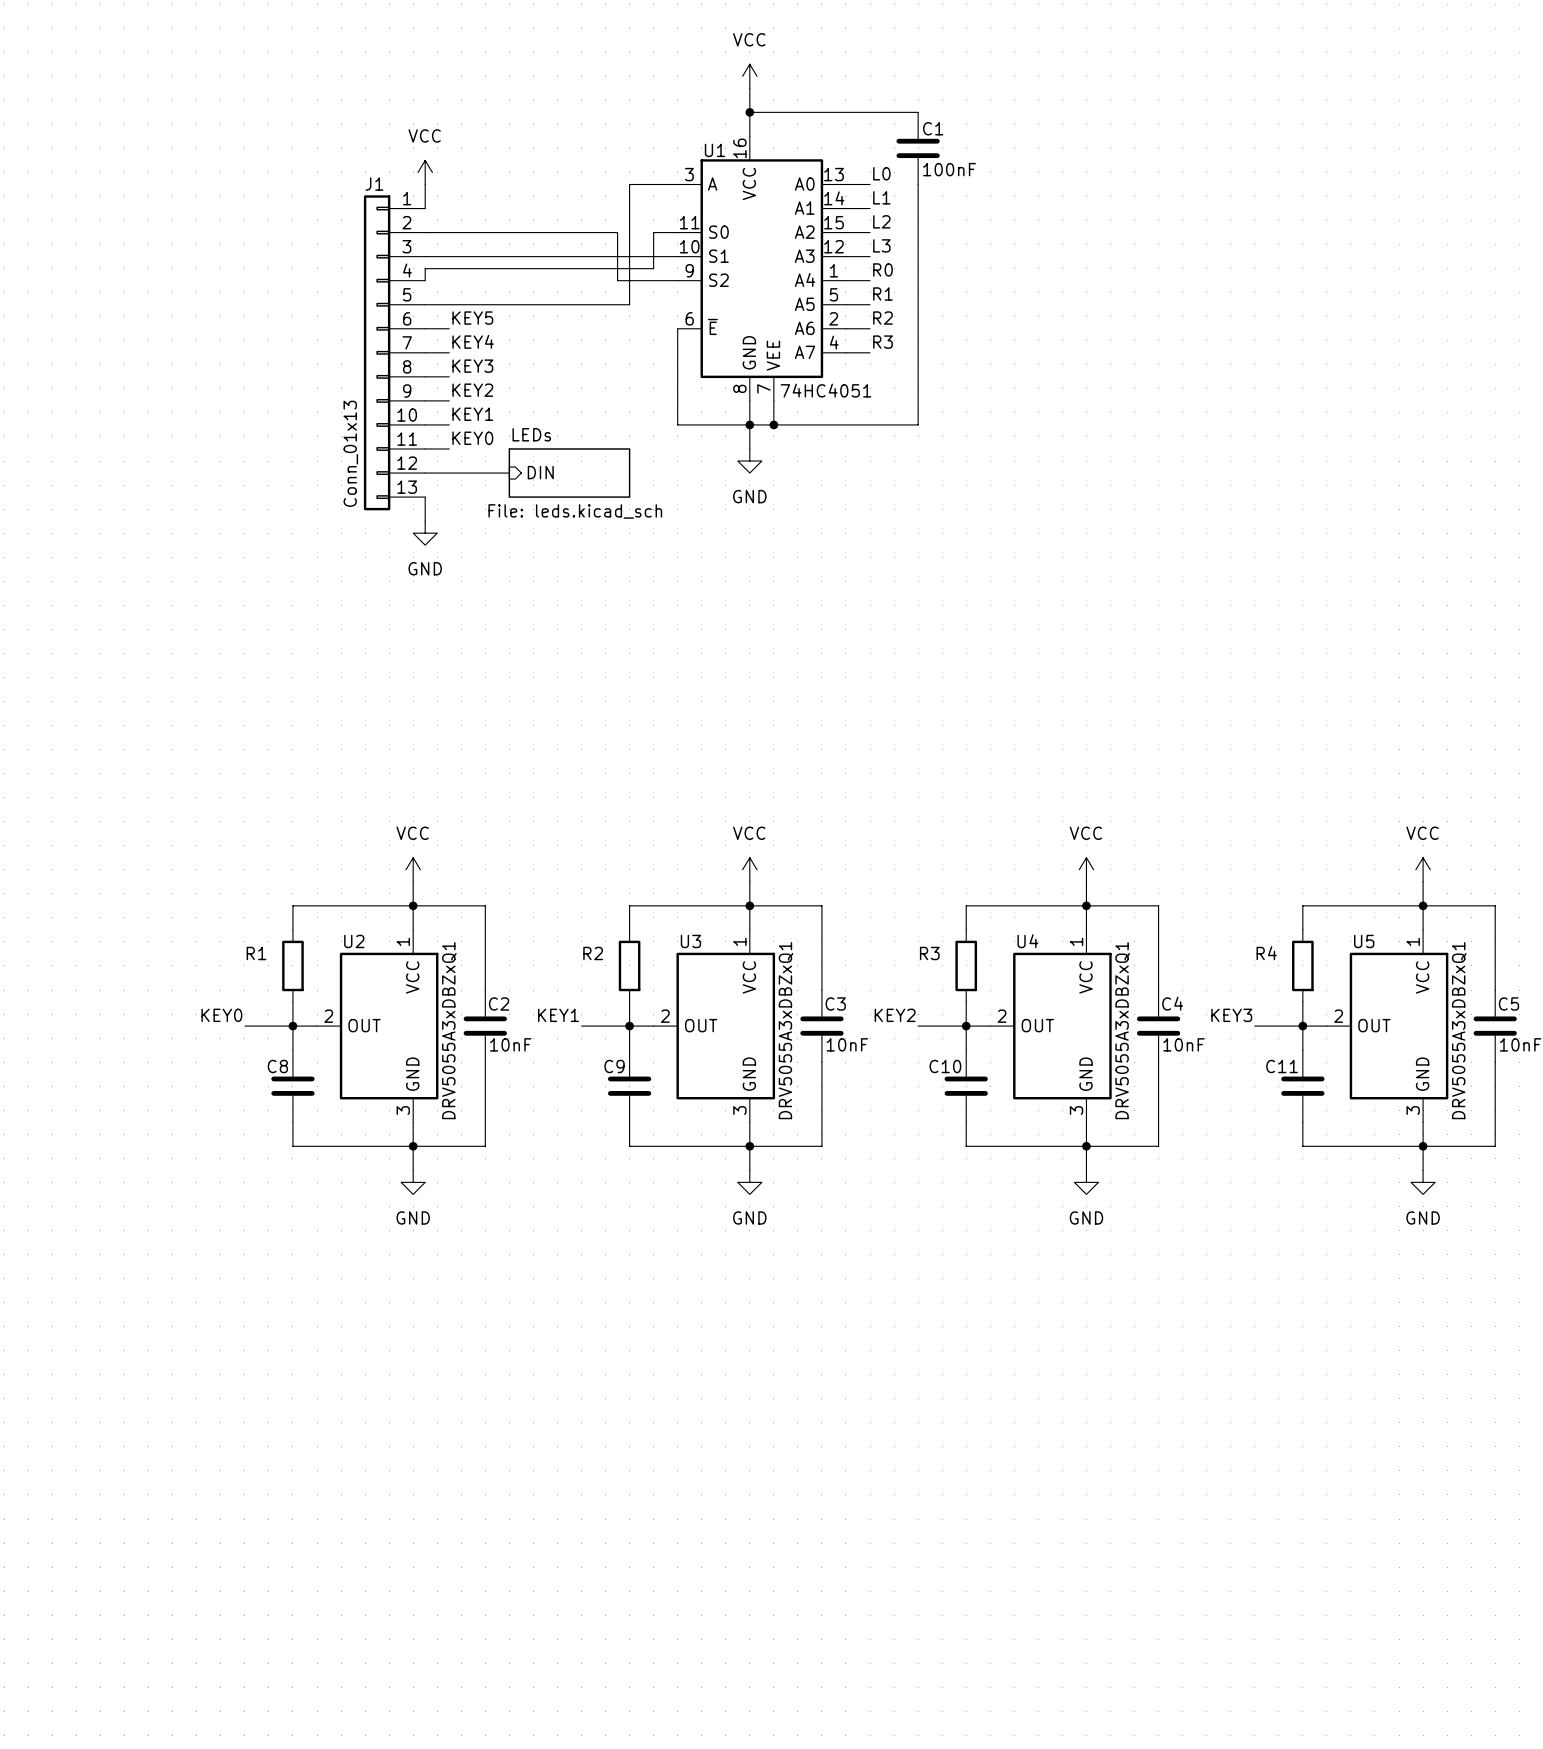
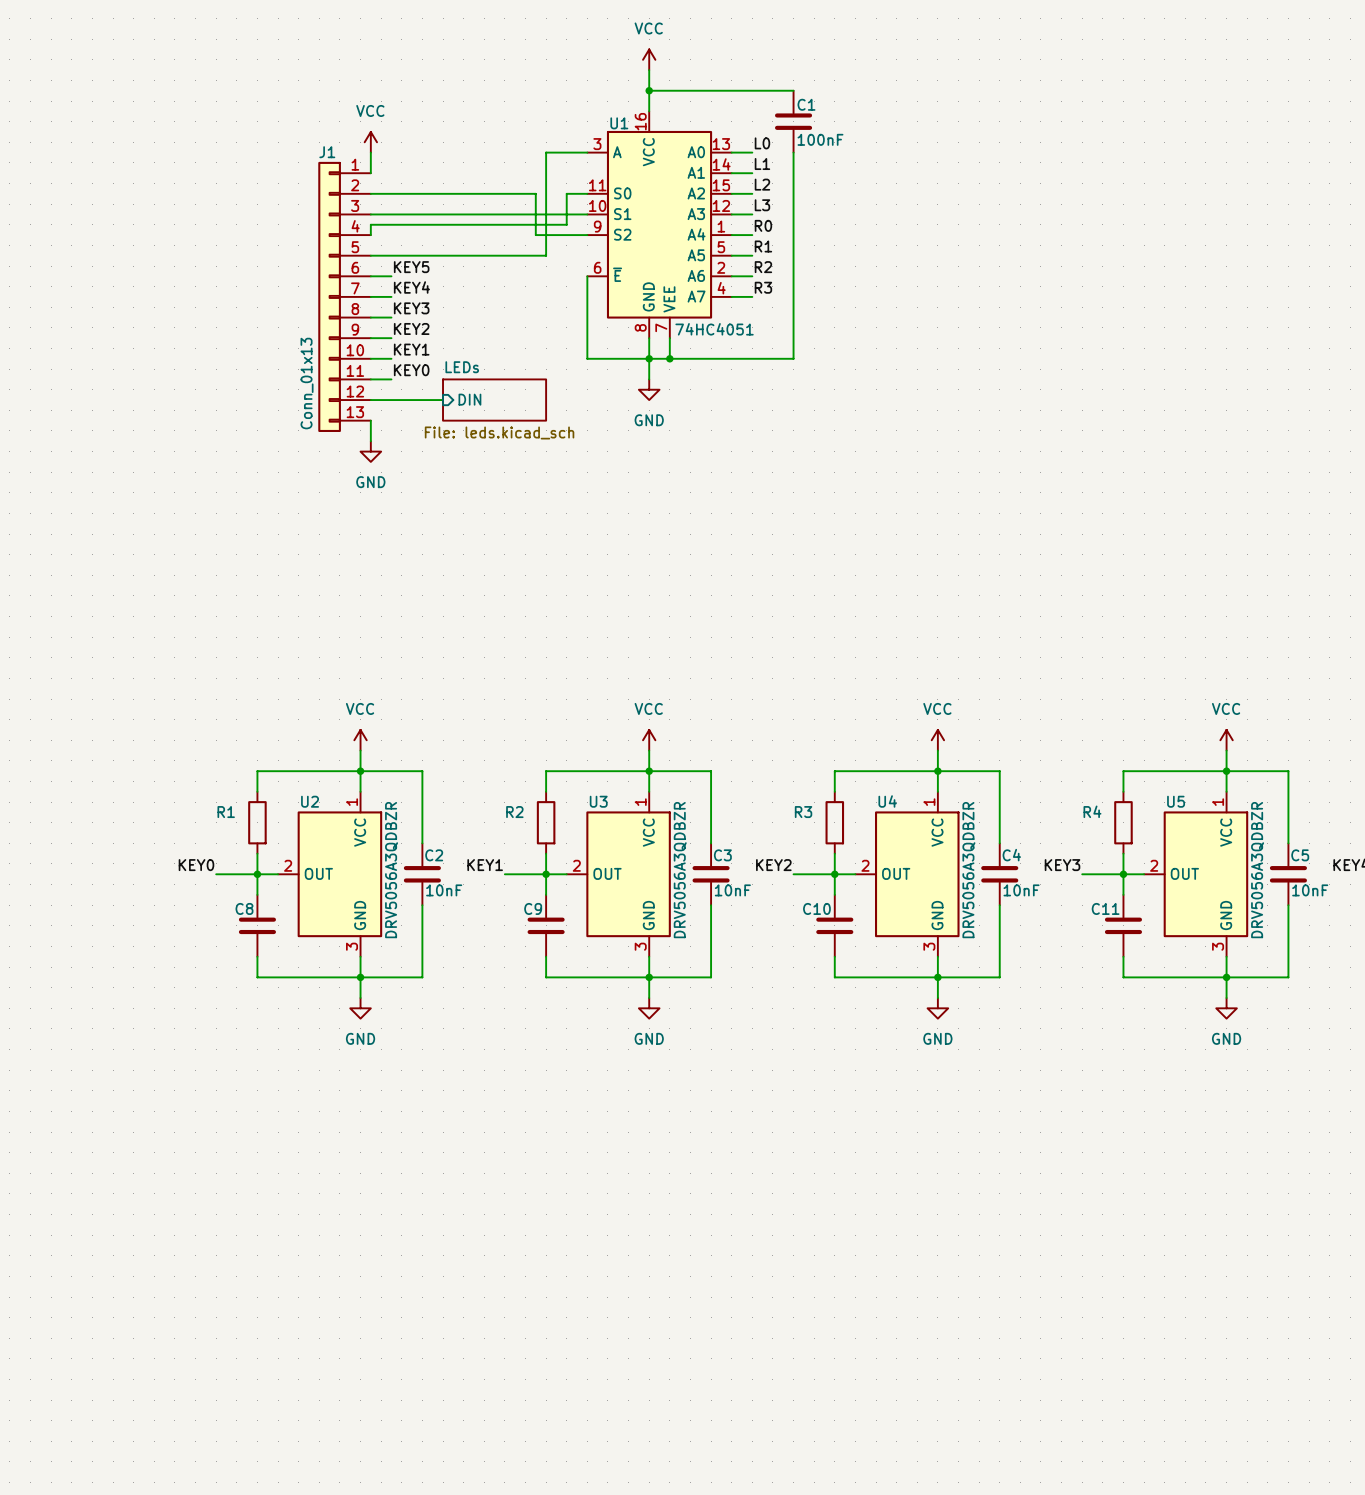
U2 value: DRV5055A3xDBZxQ1 (449, 1030) -> DRV5056A3QDBZR (391, 870)
U3 value: DRV5055A3xDBZxQ1 (786, 1030) -> DRV5056A3QDBZR (680, 870)
U4 value: DRV5055A3xDBZxQ1 (1122, 1030) -> DRV5056A3QDBZR (968, 870)
U5 value: DRV5055A3xDBZxQ1 (1459, 1030) -> DRV5056A3QDBZR (1257, 870)

